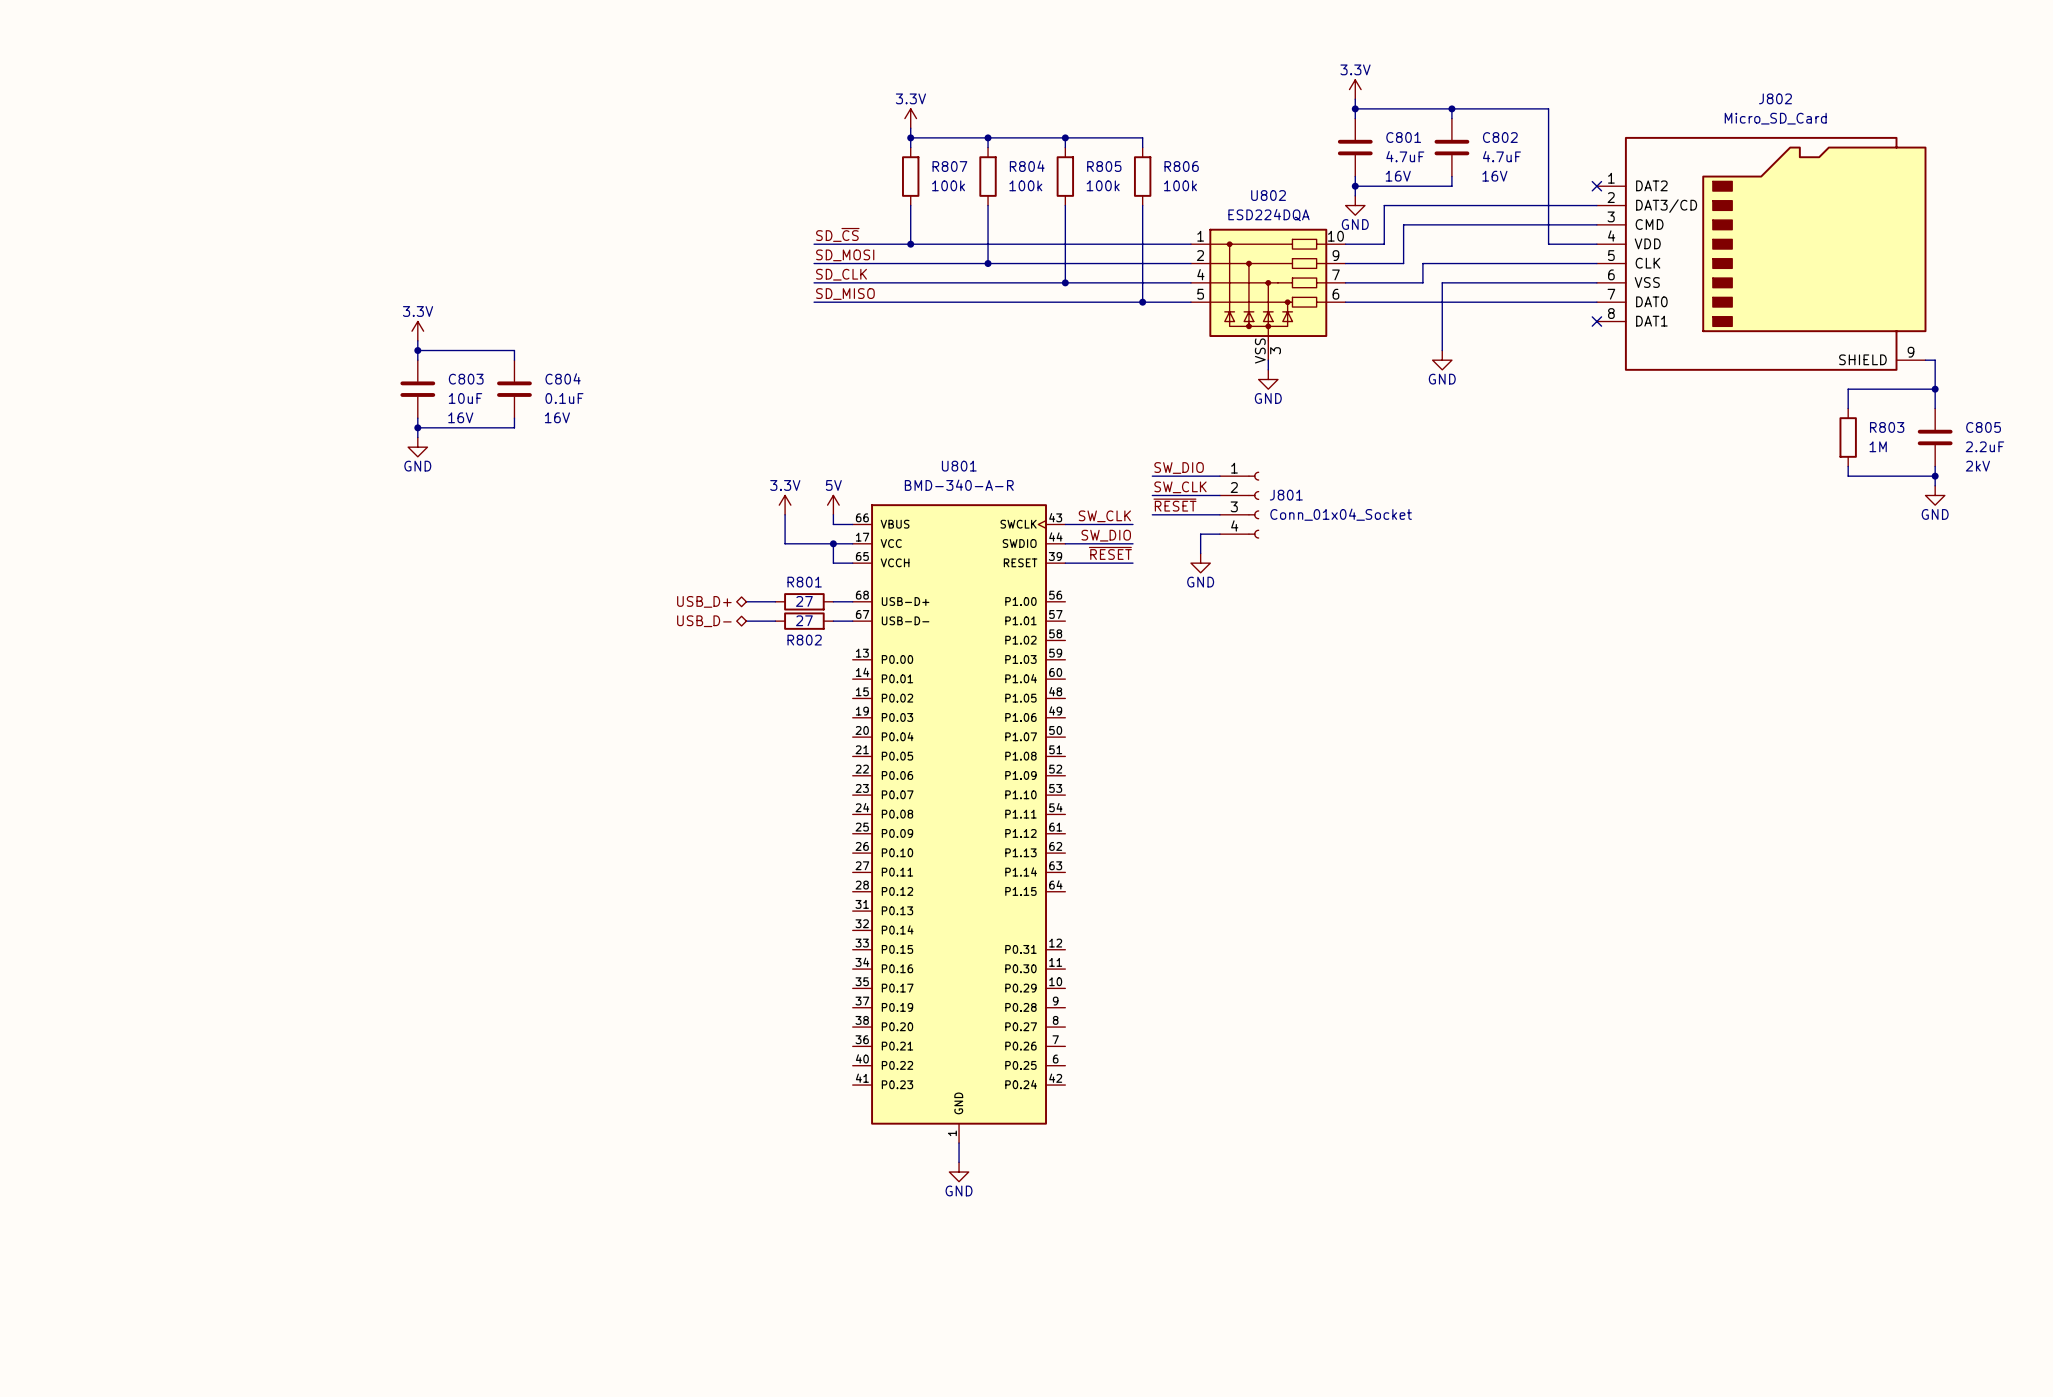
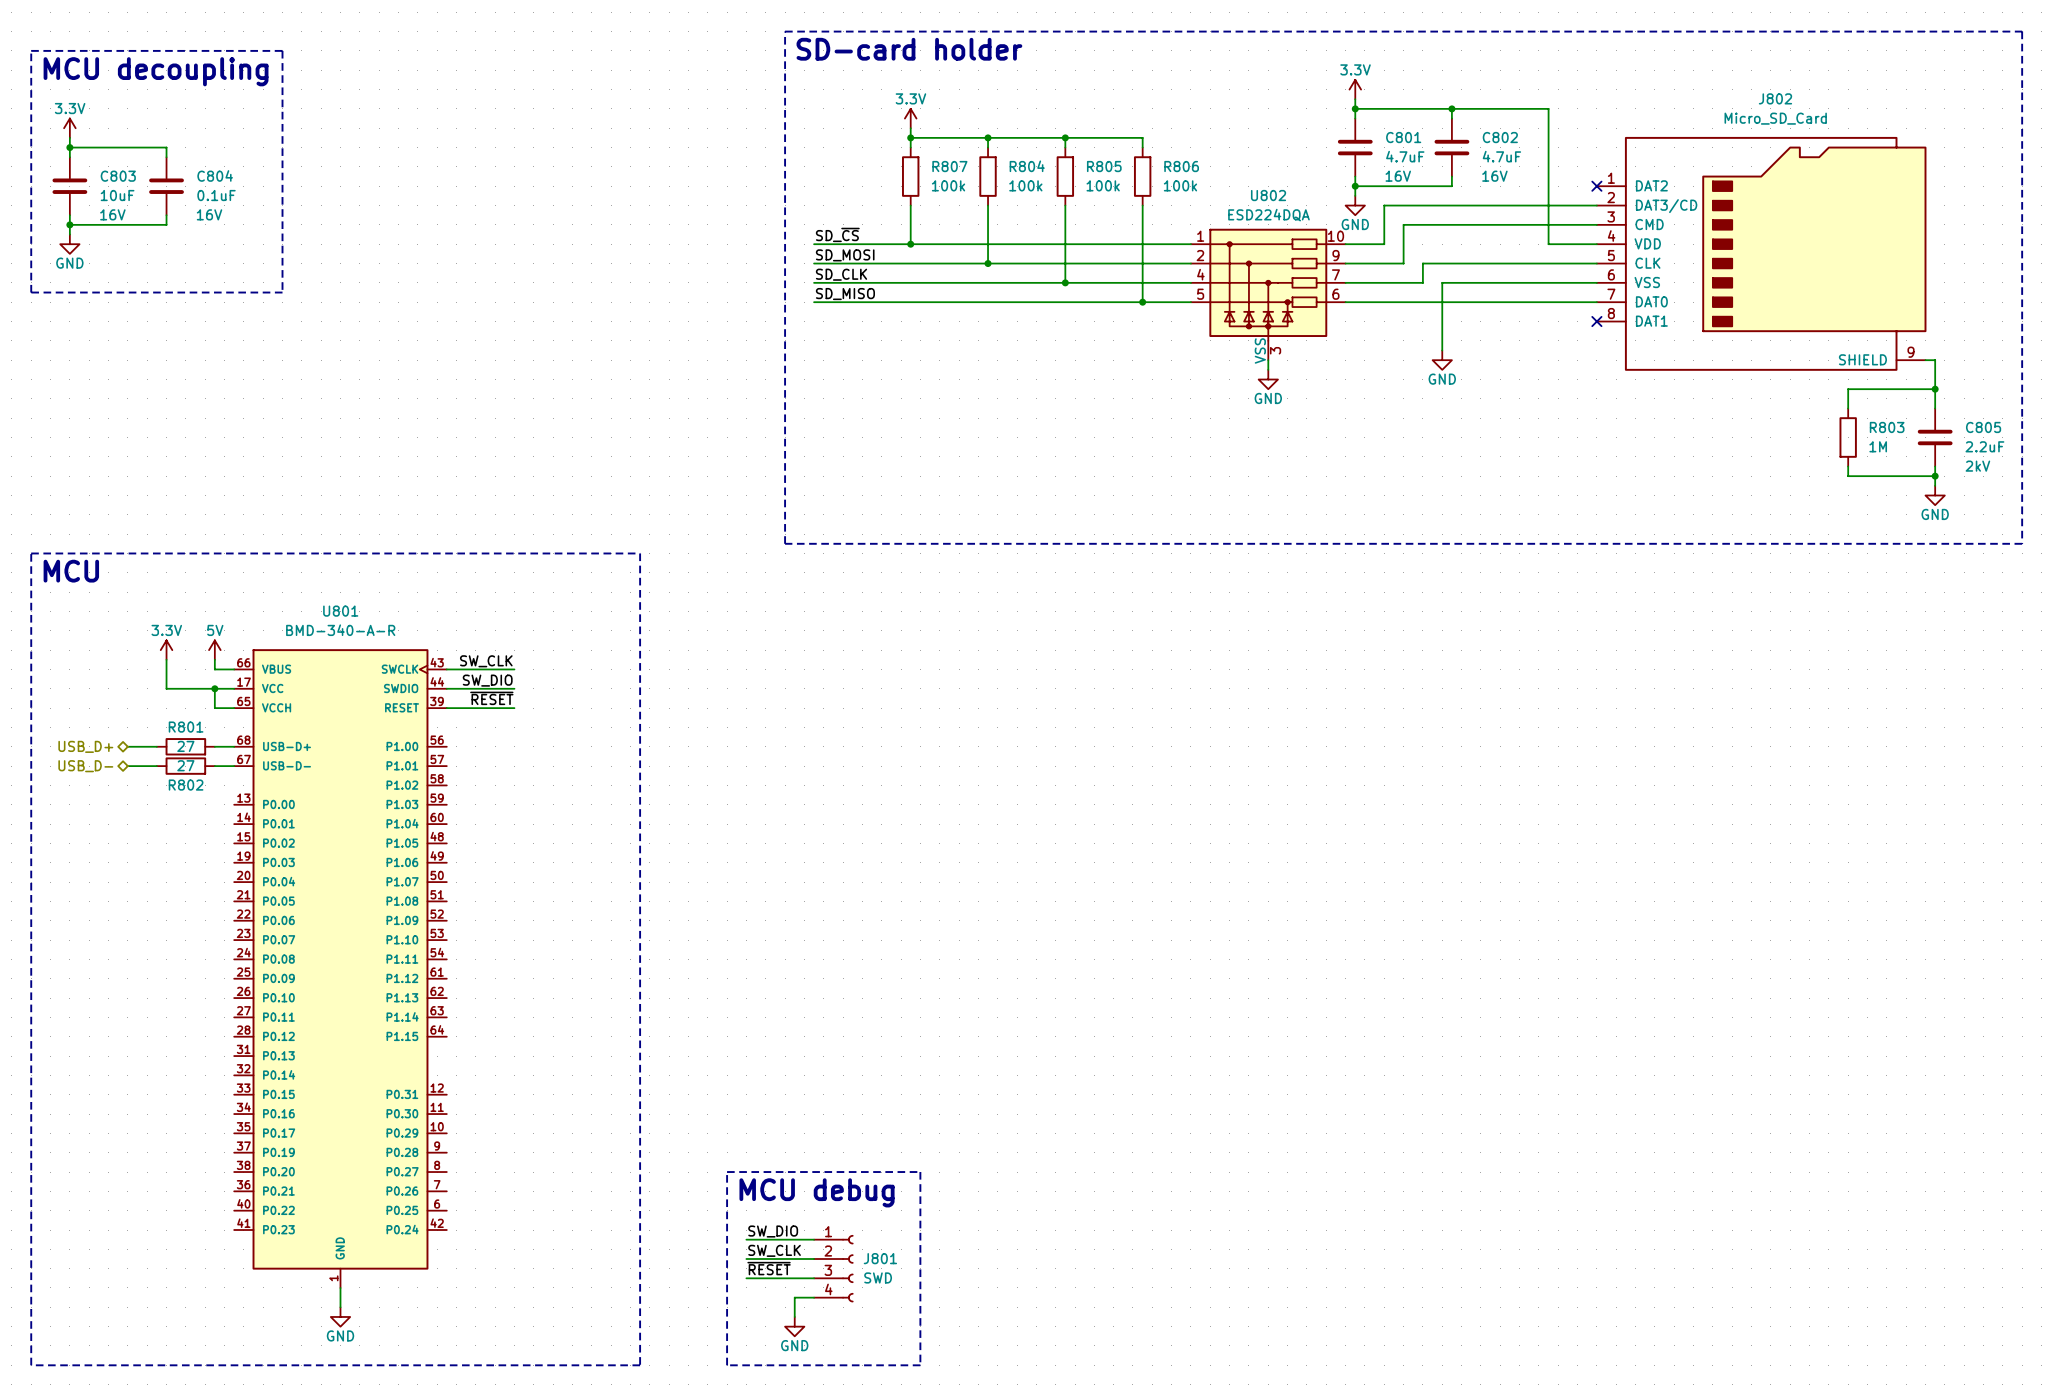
line: none -> (785, 31) (2022, 31) (2022, 543) (785, 543) (785, 31)
text: none -> SD-card holder (909, 49)
line: none -> (31, 50) (31, 292) (282, 292) (282, 50) (31, 50)
text: none -> MCU decoupling (156, 71)
power symbol: none -> 3.3V (69, 128)
wire: none -> (69, 137) (69, 157)
wire: none -> (69, 147) (166, 147) (166, 157)
junction: none -> (69, 147)
wire: none -> (69, 215) (69, 234)
wire: none -> (166, 215) (166, 224) (69, 224)
junction: none -> (69, 224)
power symbol: none -> GND (69, 244)
power symbol: 3.3V (417, 331) -> none
wire: (417, 340) (417, 360) -> none
wire: (417, 350) (514, 350) (514, 360) -> none
junction: (417, 350) -> none
C803 position: (417, 389) -> (69, 186)
C804 position: (514, 389) -> (166, 186)
wire: (417, 418) (417, 437) -> none
wire: (514, 418) (514, 427) (417, 427) -> none
junction: (417, 427) -> none
power symbol: GND (417, 447) -> none
label: SW_DIO (1179, 467) -> none
wire: (1152, 476) (1219, 476) -> none
label: SW_CLK (1180, 487) -> none
wire: (1152, 495) (1219, 495) -> none
power symbol: 3.3V (785, 505) -> none
power symbol: 5V (833, 505) -> none
label: ~{RESET} (1174, 505) -> none
J801 position: (1239, 505) -> (833, 1268)
wire: (833, 514) (833, 524) (852, 524) -> none
wire: (1152, 514) (1219, 514) -> none
J801 value: Conn_01x04_Socket (1341, 514) -> SWD (878, 1277)
label: SW_CLK (1104, 516) -> none
wire: (1065, 524) (1132, 524) -> none
wire: (1219, 534) (1200, 534) (1200, 553) -> none
label: SW_DIO (1106, 535) -> none
wire: (833, 543) (833, 563) (852, 563) -> none
junction: (833, 543) -> none
line: none -> (31, 553) (640, 553) (640, 1365) (31, 1365) (31, 553)
label: ~{RESET} (1110, 553) -> none
wire: (1065, 563) (1132, 563) -> none
power symbol: GND (1200, 563) -> none
text: none -> MCU (71, 571)
hierarchical label: USB_D+ (704, 601) -> none
wire: (746, 601) (775, 601) -> none
R801 position: (804, 601) -> (185, 746)
wire: (833, 601) (852, 601) -> none
hierarchical label: USB_D- (704, 621) -> none
wire: (746, 621) (775, 621) -> none
R802 position: (804, 621) -> (185, 766)
wire: (833, 621) (852, 621) -> none
power symbol: none -> 3.3V (166, 650)
power symbol: none -> 5V (214, 650)
wire: none -> (166, 659) (166, 688) (234, 688)
wire: none -> (214, 659) (214, 669) (234, 669)
label: none -> SW_CLK (486, 661)
wire: none -> (446, 669) (514, 669)
label: none -> SW_DIO (487, 680)
wire: none -> (214, 688) (214, 708) (234, 708)
junction: none -> (214, 688)
wire: none -> (446, 688) (514, 688)
label: none -> ~{RESET} (491, 698)
wire: none -> (446, 708) (514, 708)
hierarchical label: none -> USB_D+ (85, 746)
wire: none -> (127, 746) (156, 746)
wire: none -> (214, 746) (234, 746)
hierarchical label: none -> USB_D- (85, 766)
wire: none -> (127, 766) (156, 766)
wire: none -> (214, 766) (234, 766)
U801 position: (959, 823) -> (340, 968)
wire: (959, 1143) (959, 1162) -> none
line: none -> (727, 1172) (920, 1172) (920, 1365) (727, 1365) (727, 1172)
power symbol: GND (959, 1172) -> none
text: none -> MCU debug (817, 1192)
label: none -> SW_DIO (773, 1231)
wire: none -> (746, 1239) (814, 1239)
label: none -> SW_CLK (774, 1250)
wire: none -> (746, 1259) (814, 1259)
label: none -> ~{RESET} (769, 1268)
wire: none -> (746, 1278) (814, 1278)
wire: none -> (340, 1287) (340, 1307)
wire: none -> (814, 1297) (794, 1297) (794, 1316)
power symbol: none -> GND (340, 1316)
power symbol: none -> GND (794, 1326)

